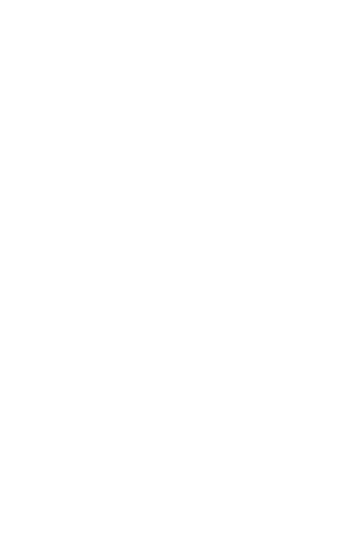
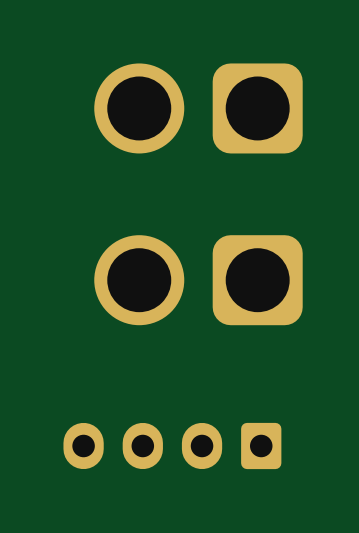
part: none -> (198, 108)
part: none -> (198, 280)
part: none -> (172, 446)

